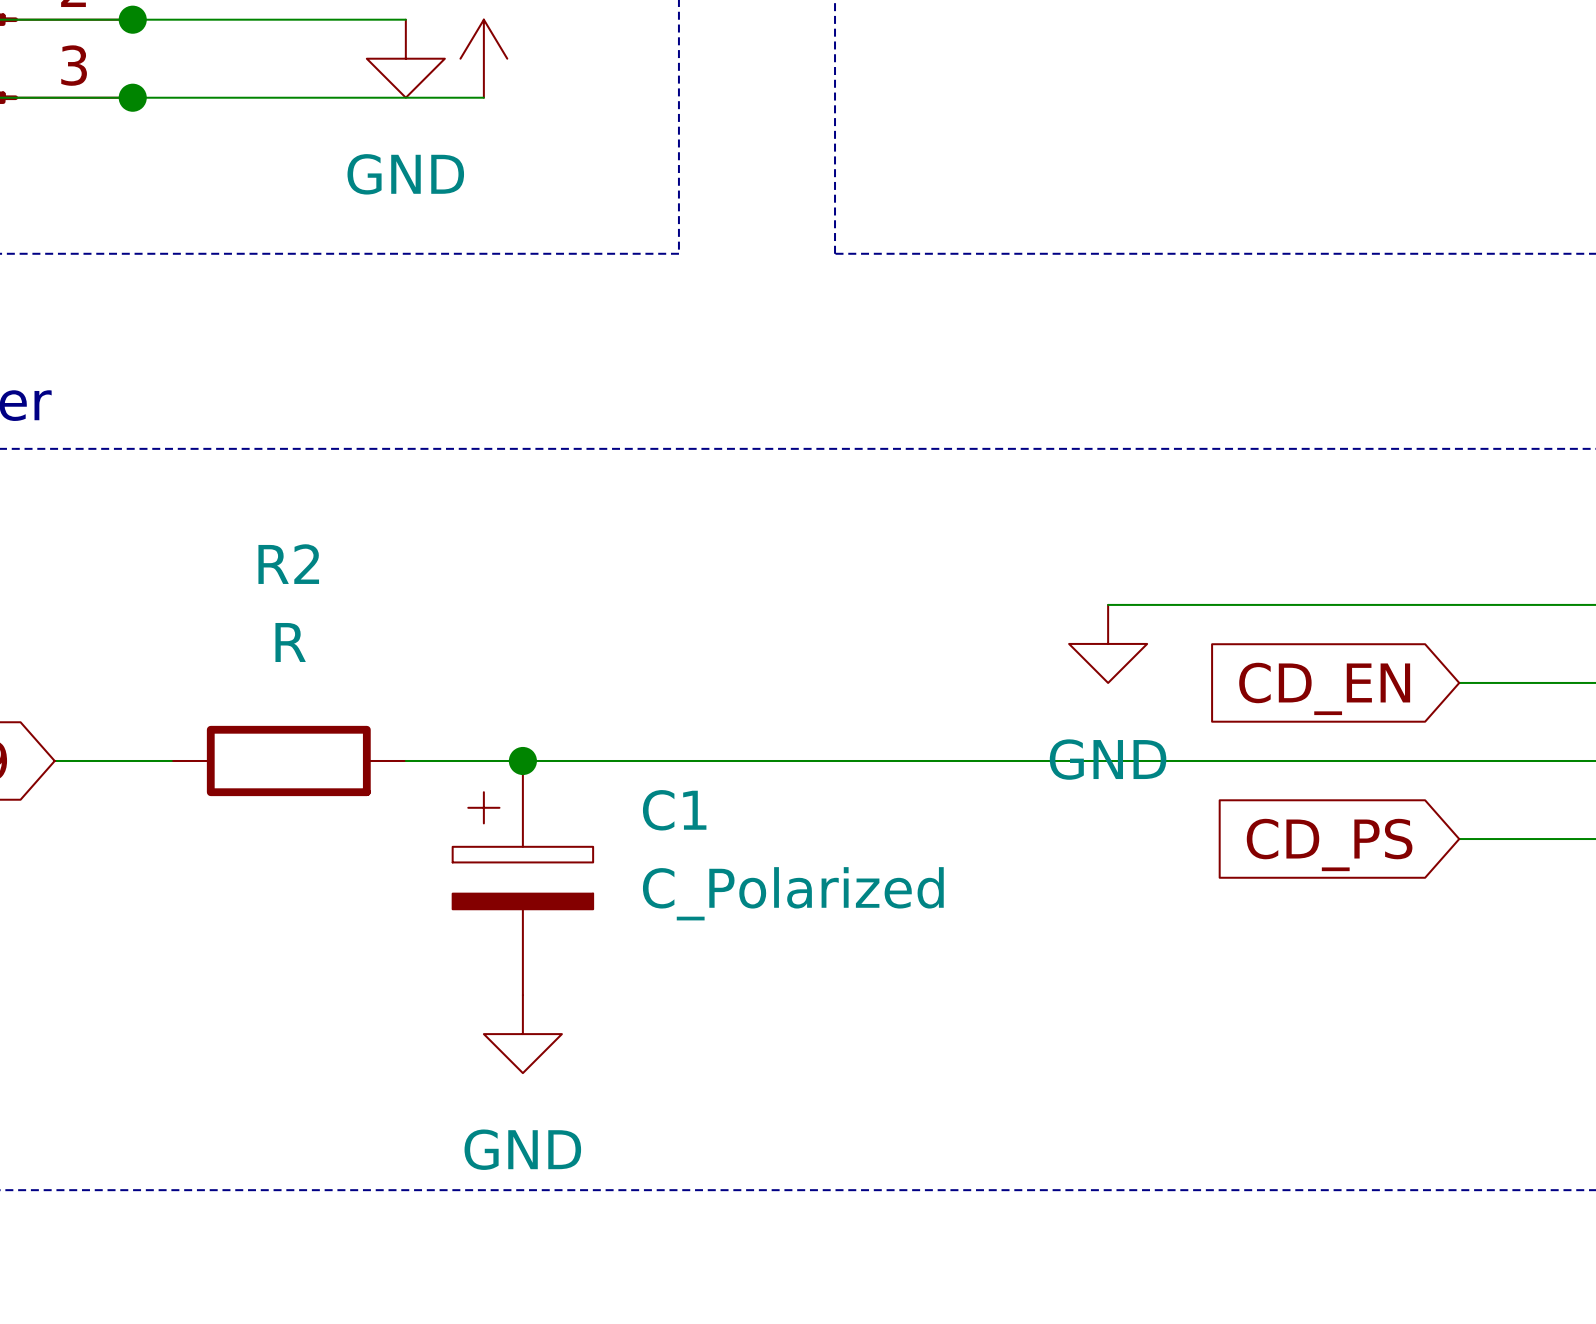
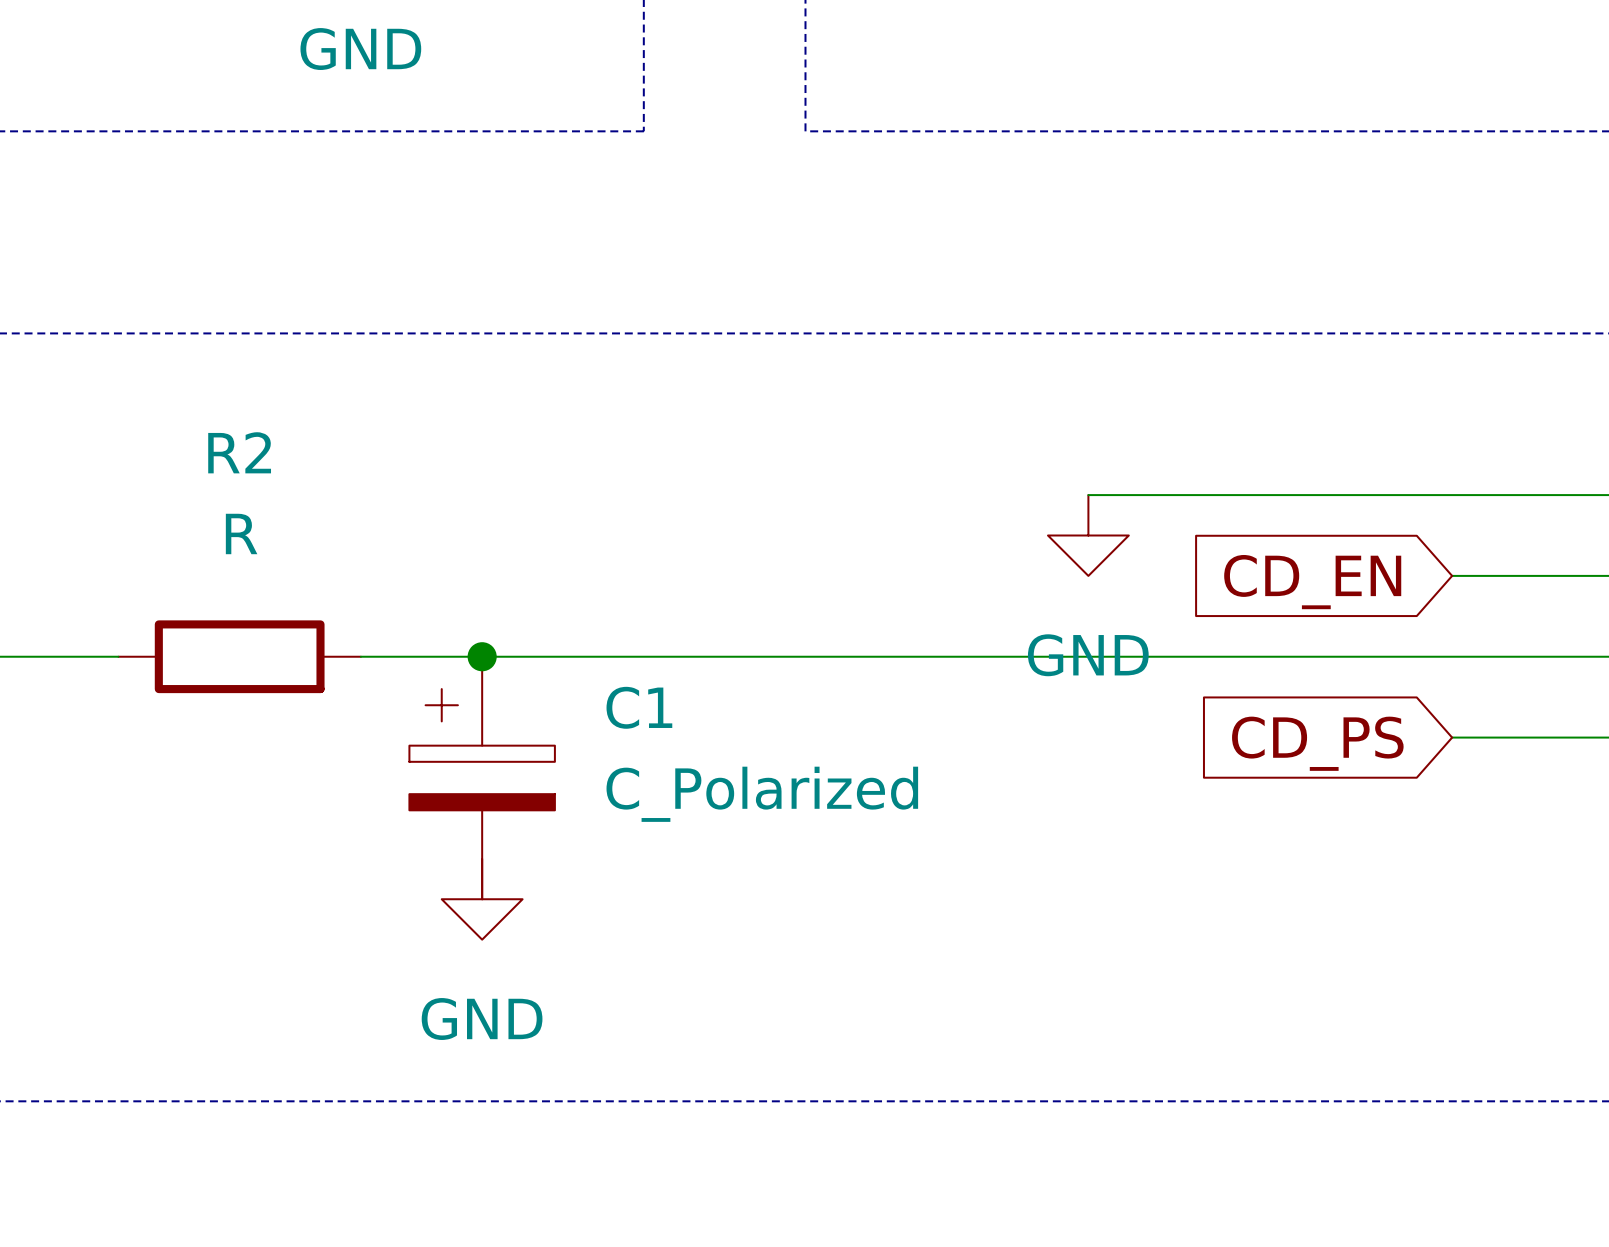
power symbol position: GND (522, 1034) -> GND (482, 899)

